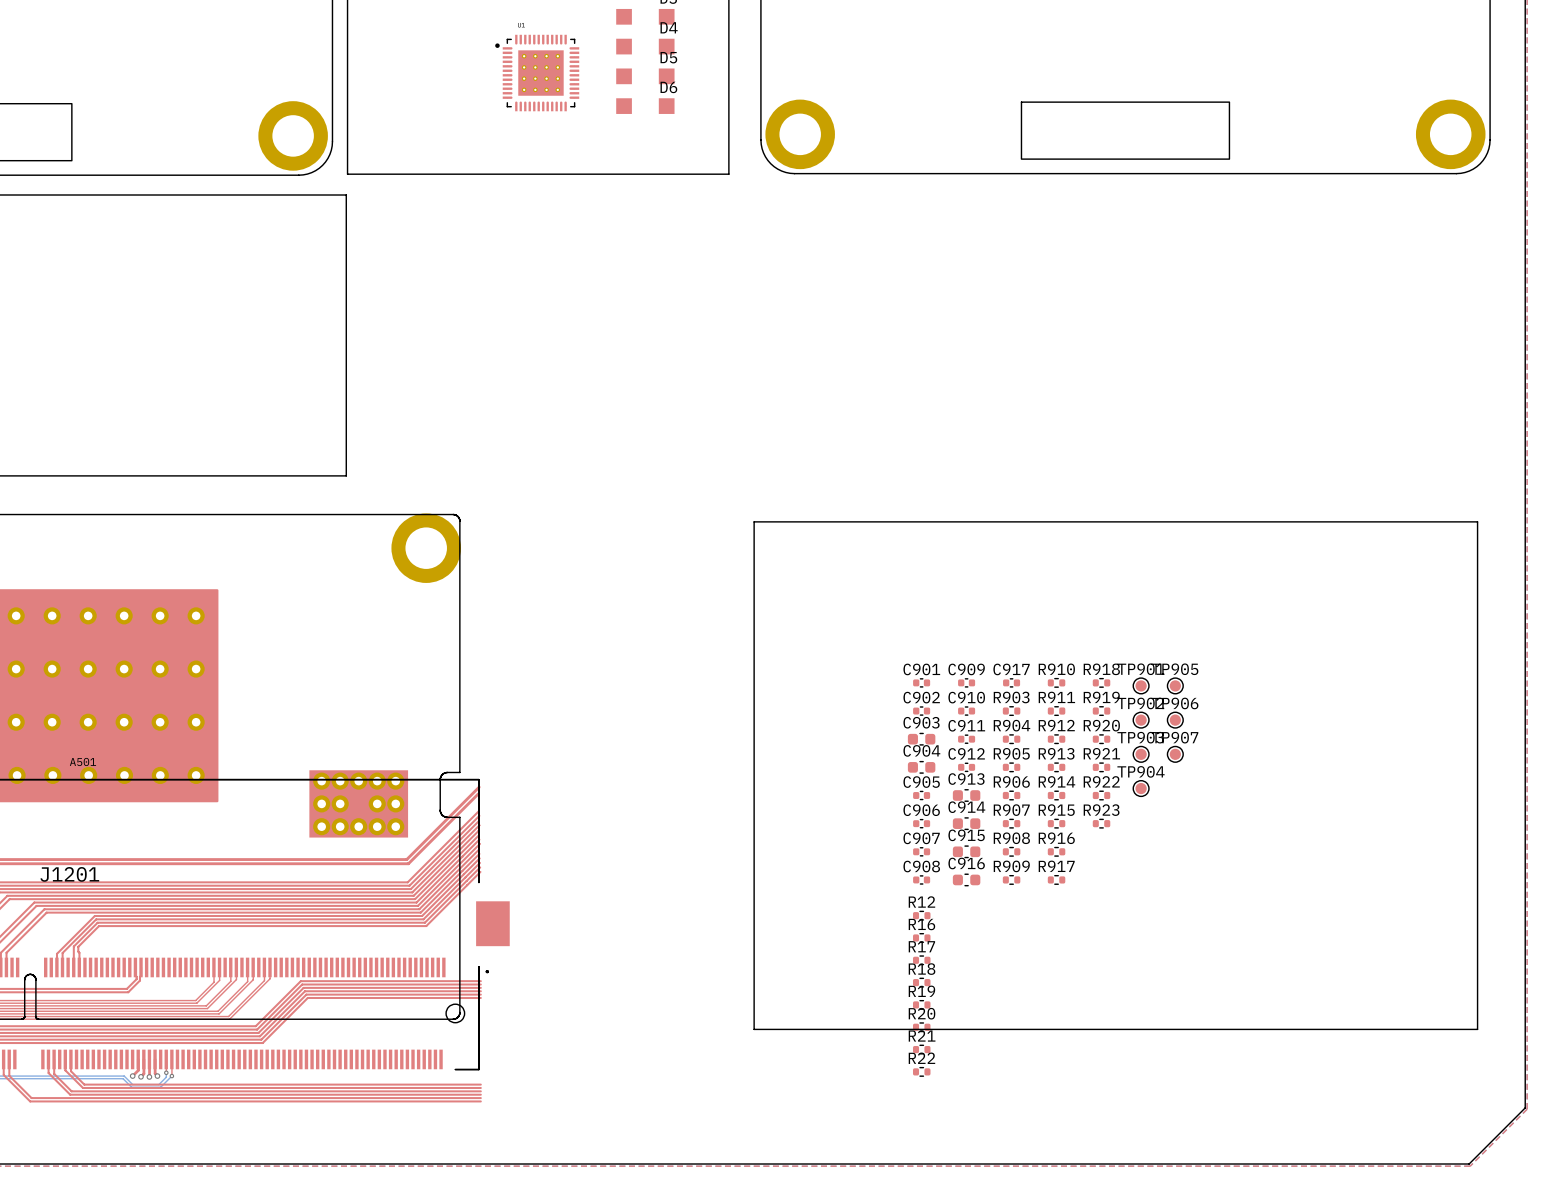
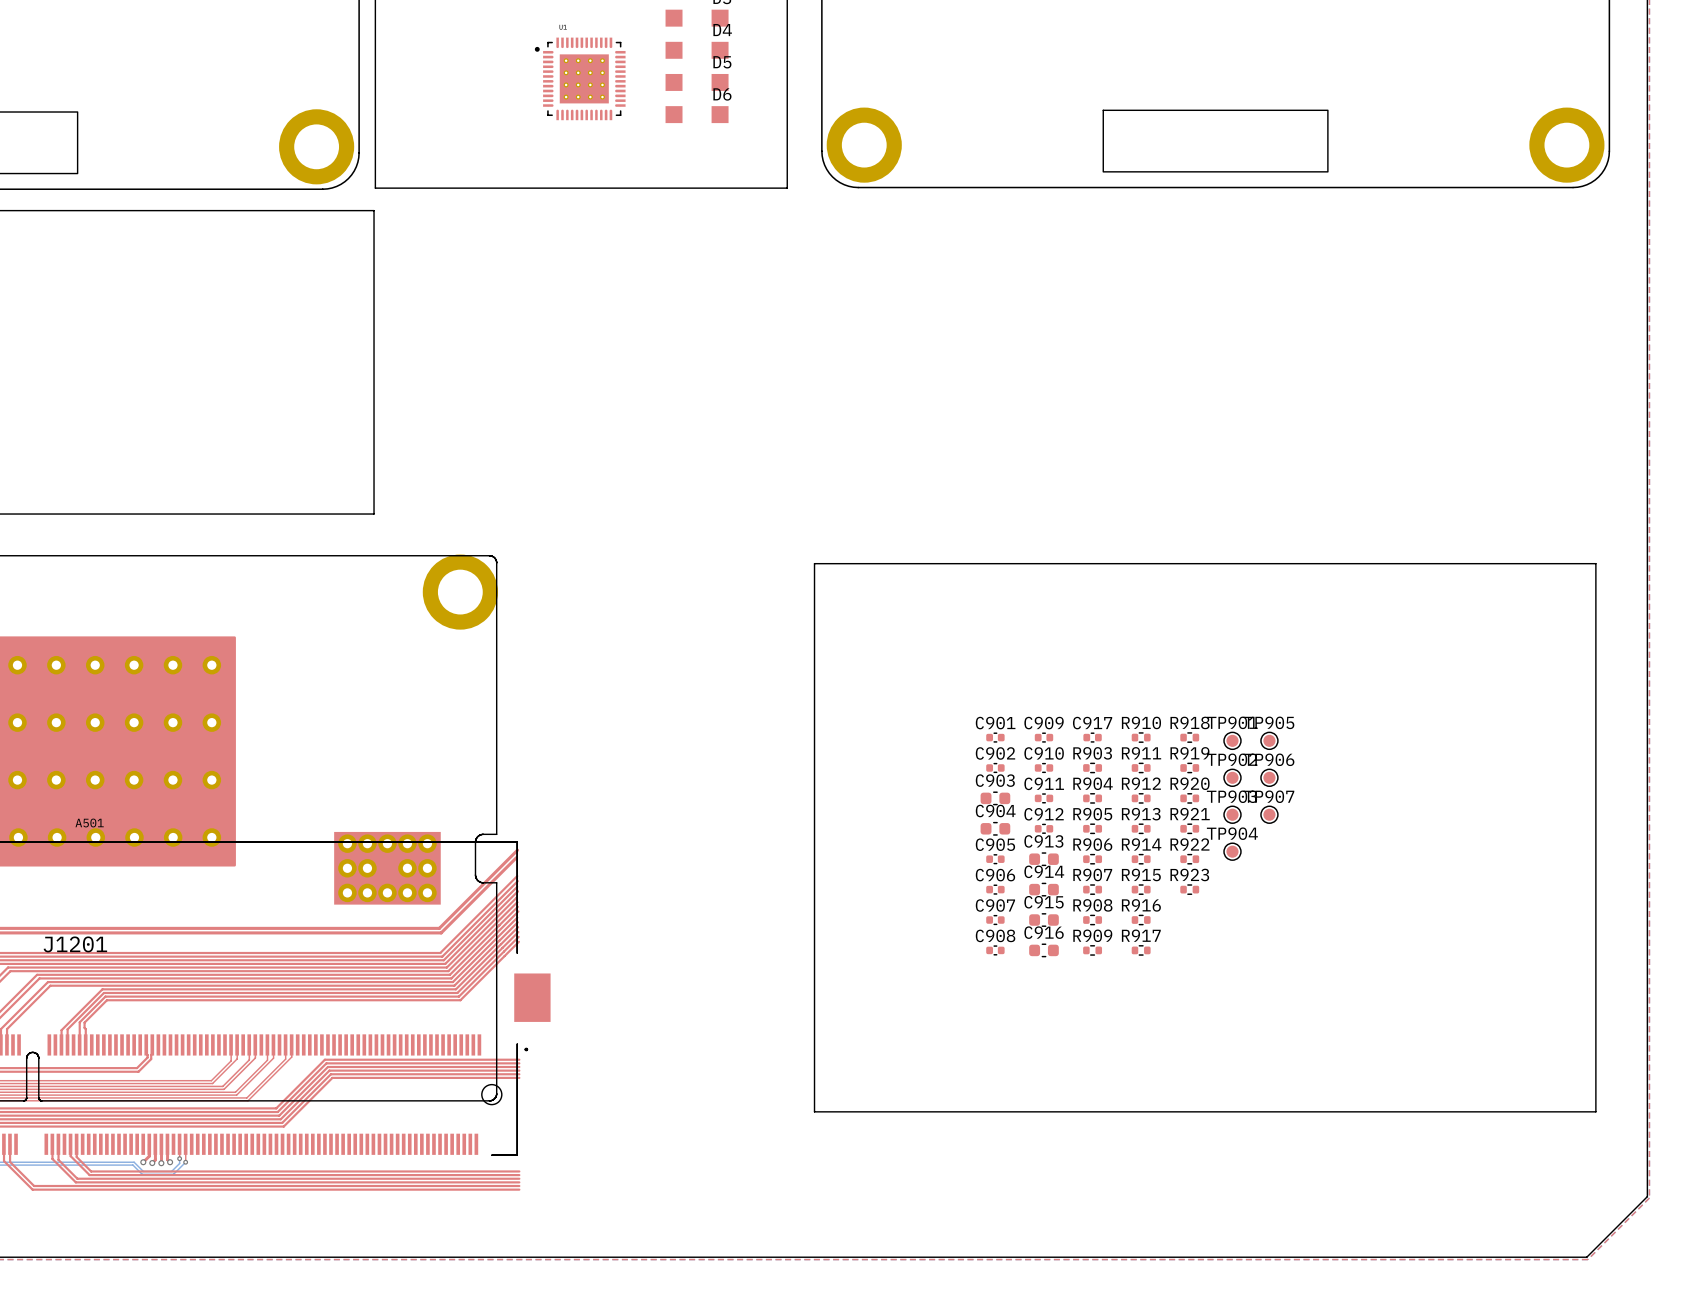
R12: (921, 915) -> none
R16: (921, 937) -> none
R17: (921, 960) -> none
R18: (921, 982) -> none
R19: (921, 1004) -> none
R20: (921, 1027) -> none
R21: (921, 1049) -> none
R22: (921, 1071) -> none

